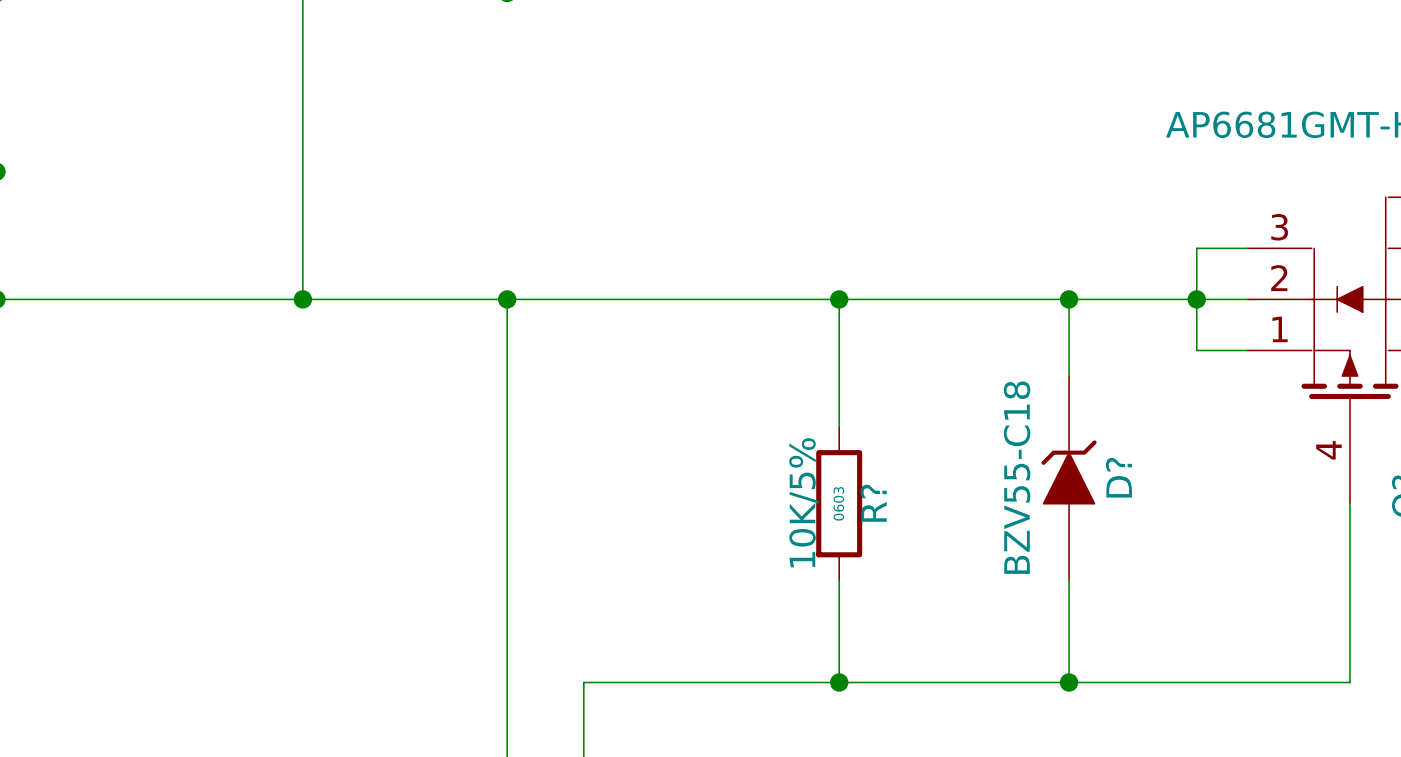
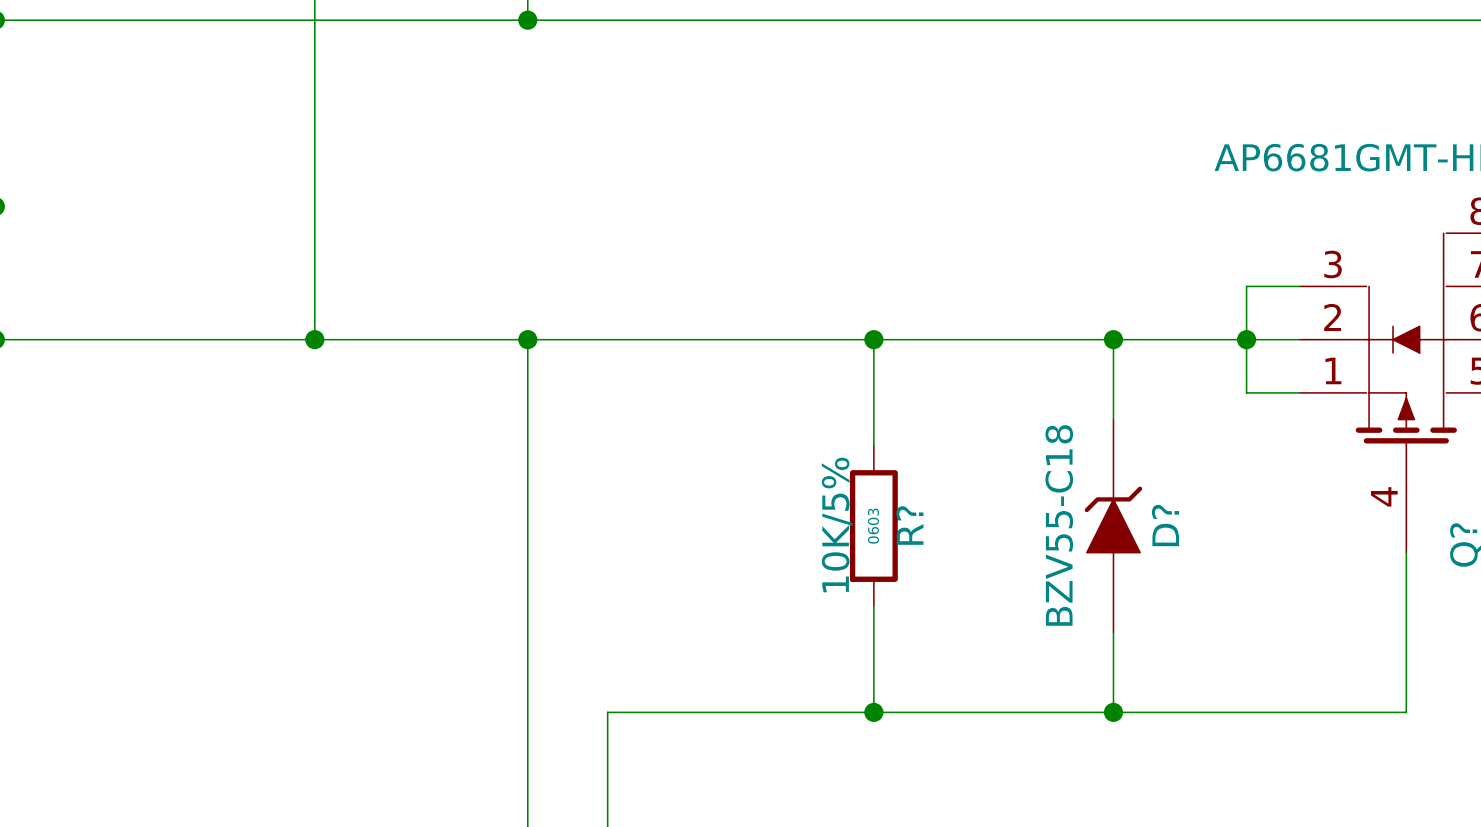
R? position: (839, 503) -> (873, 526)
wire: (1069, 656) (1069, 682) -> none
wire: (1349, 656) (1349, 682) (583, 682) -> (1406, 712) (607, 712) (607, 739)
junction position: (839, 682) -> (873, 712)
junction position: (1069, 682) -> (1113, 712)

